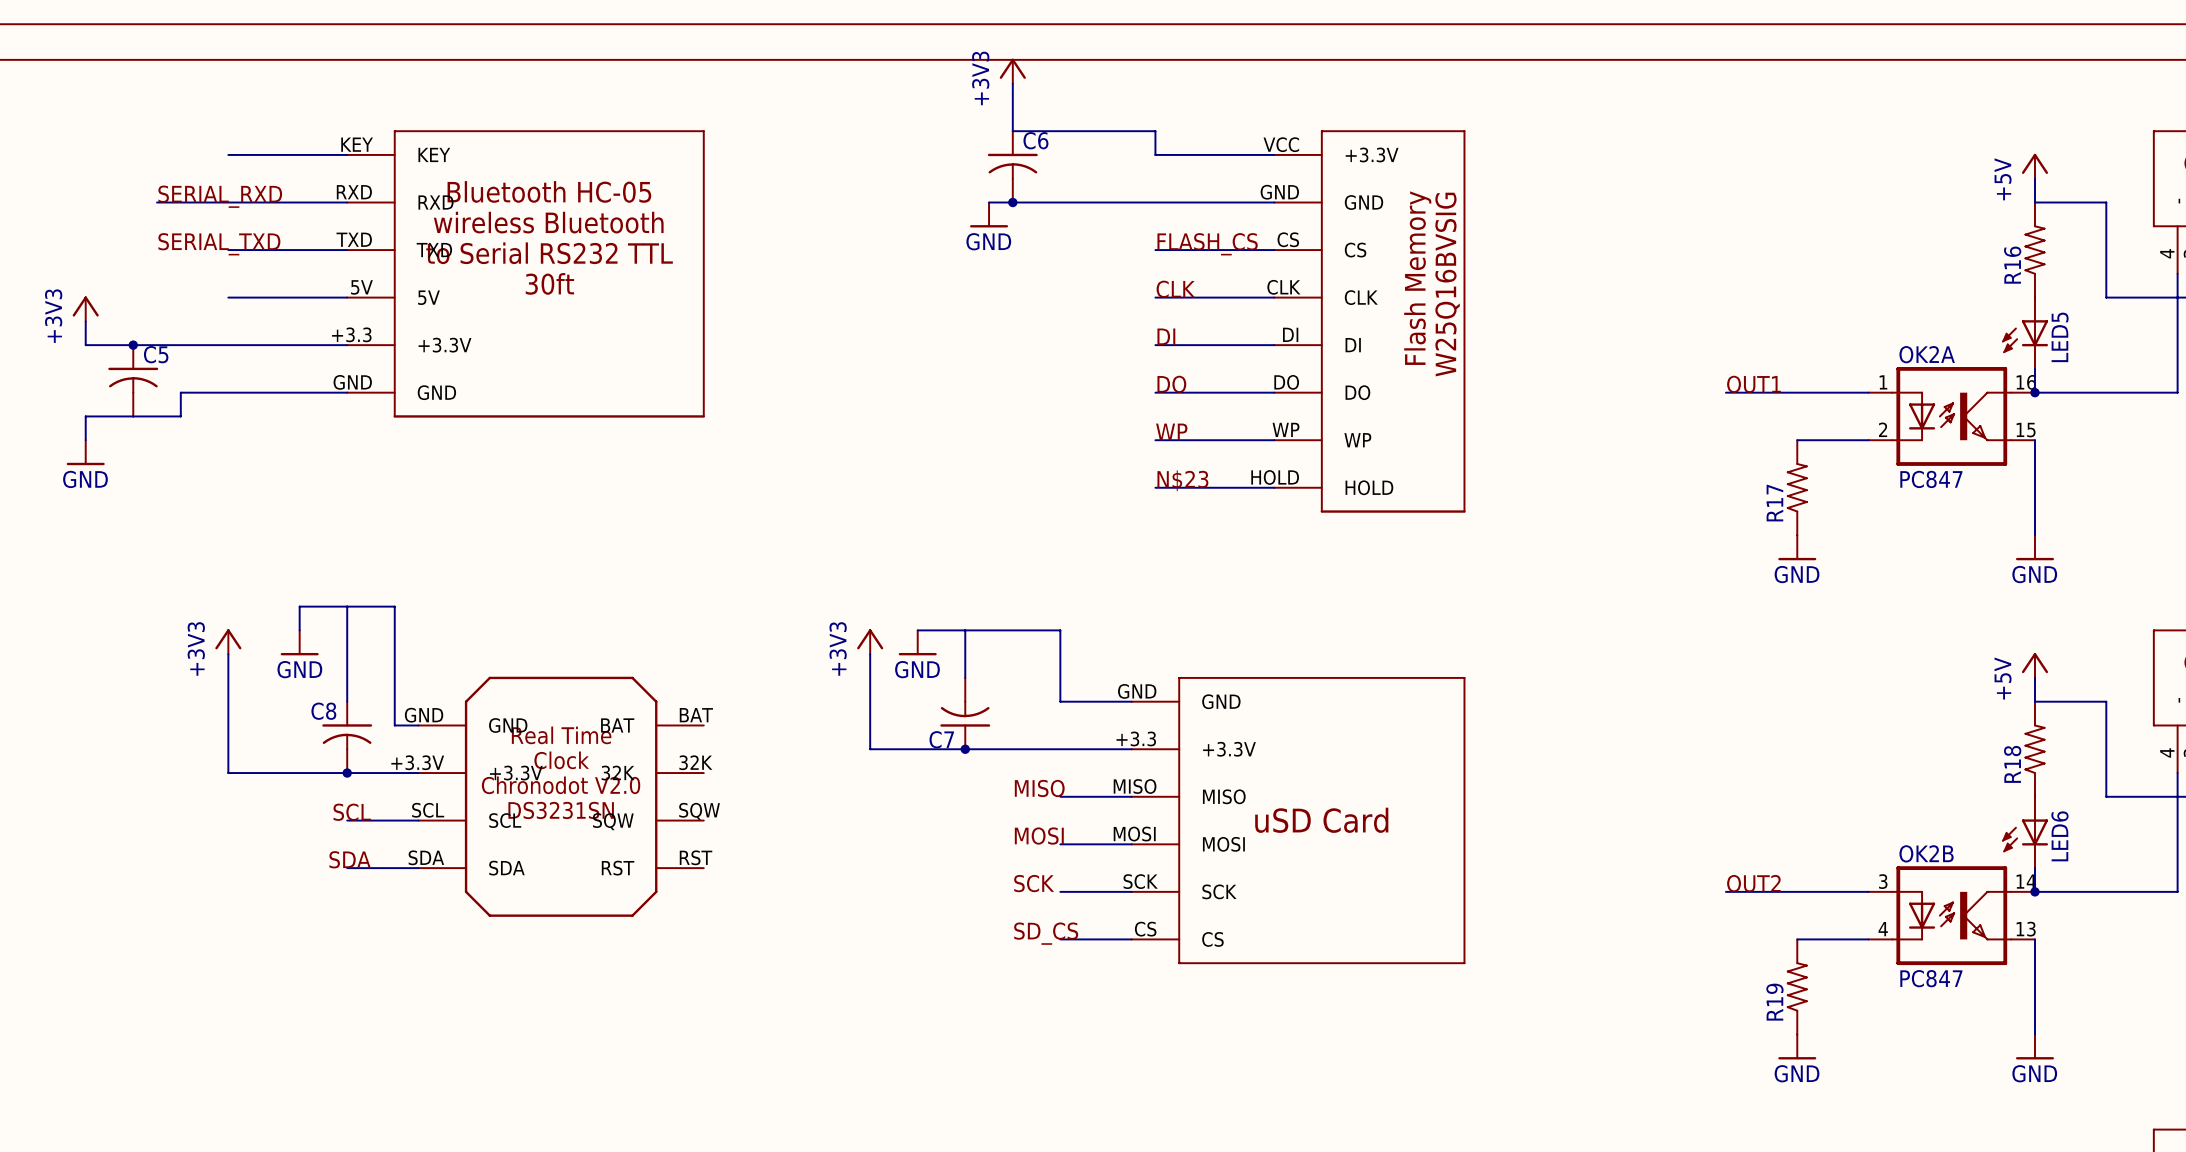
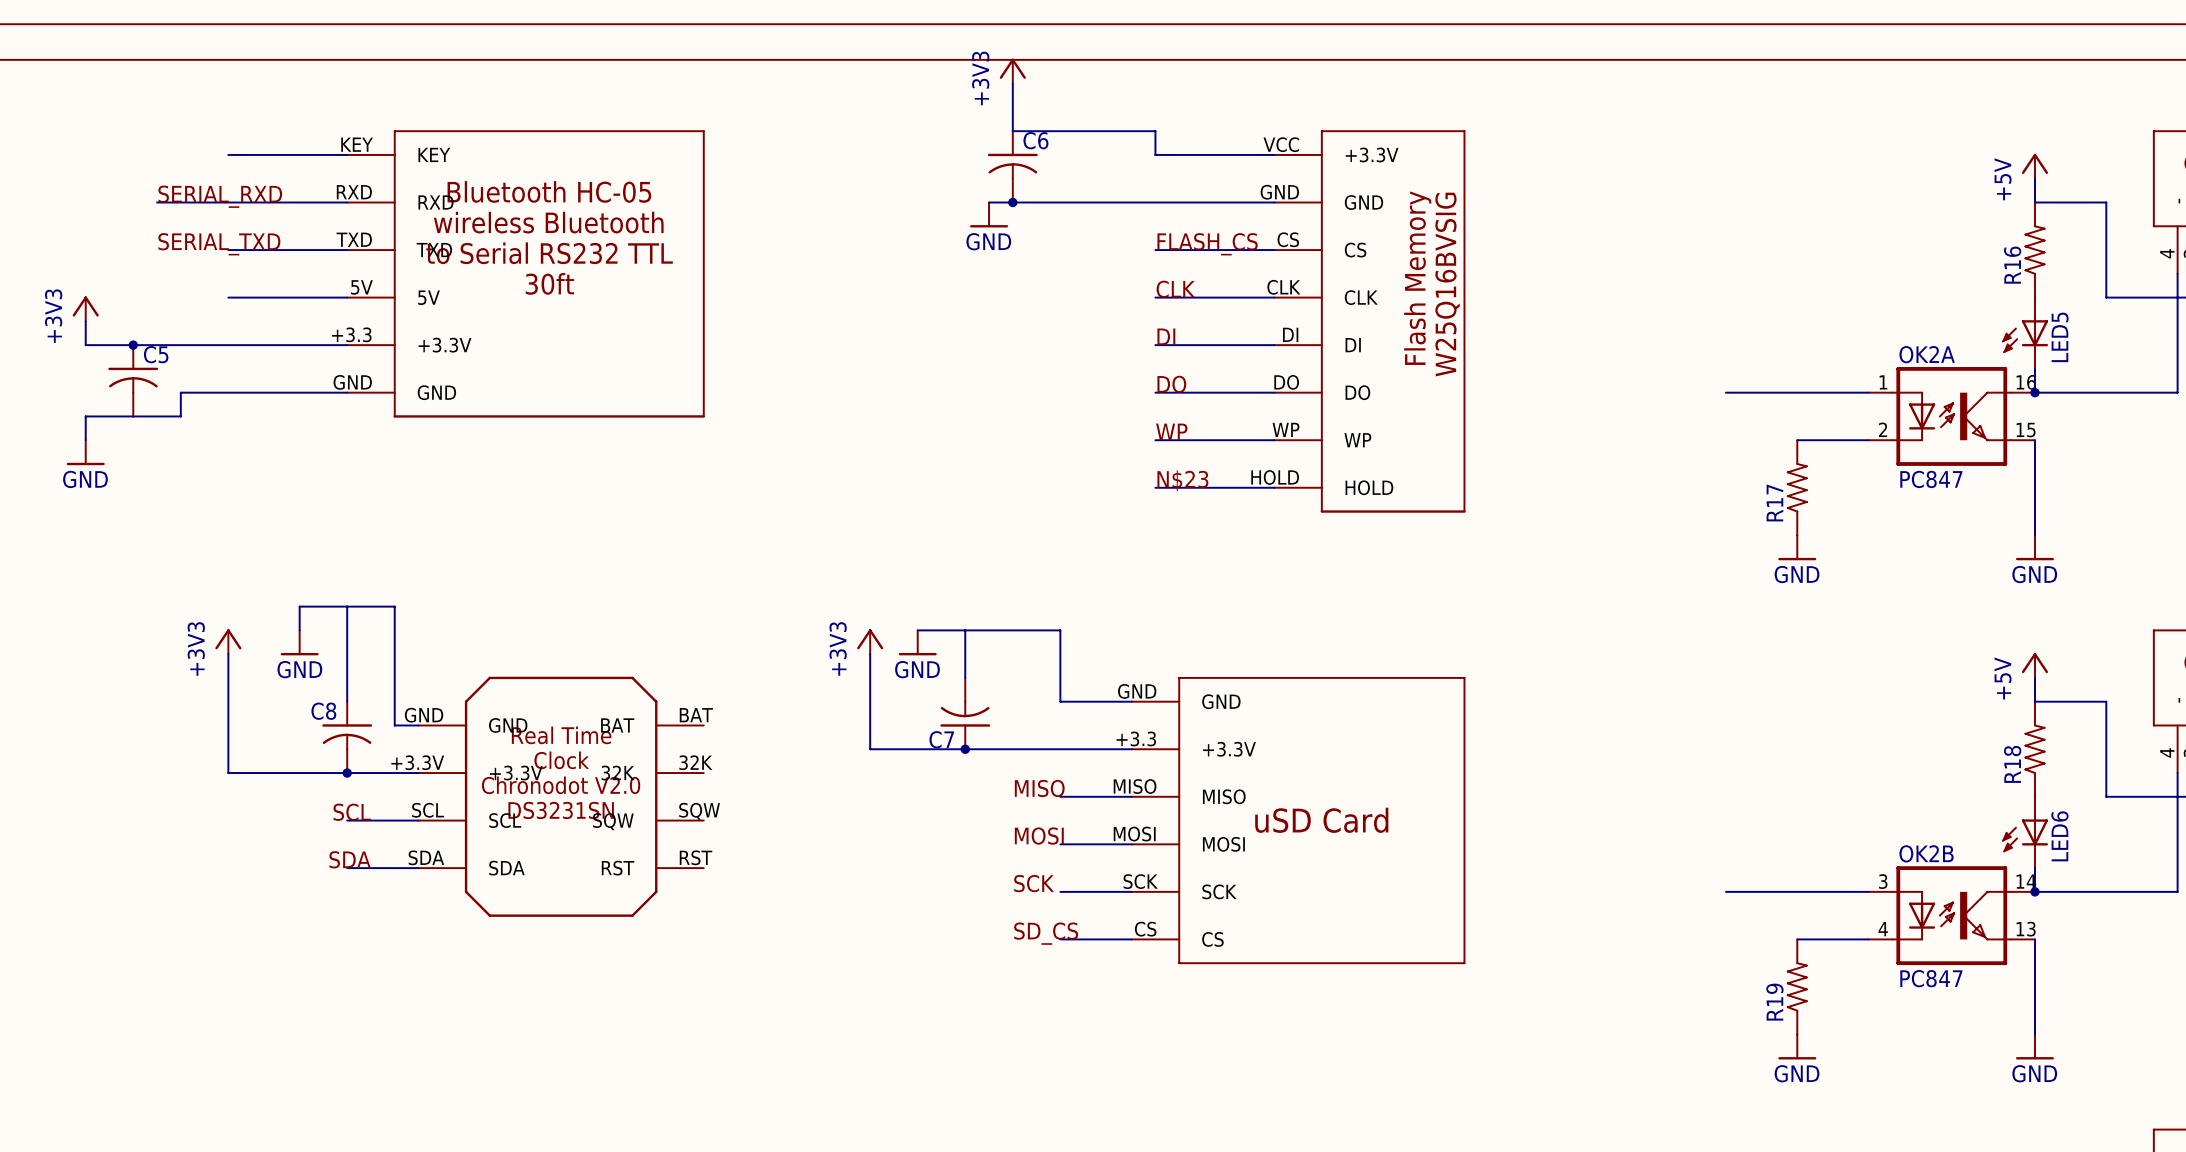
label: OUT1 (1753, 384) -> none
label: OUT2 (1753, 883) -> none

